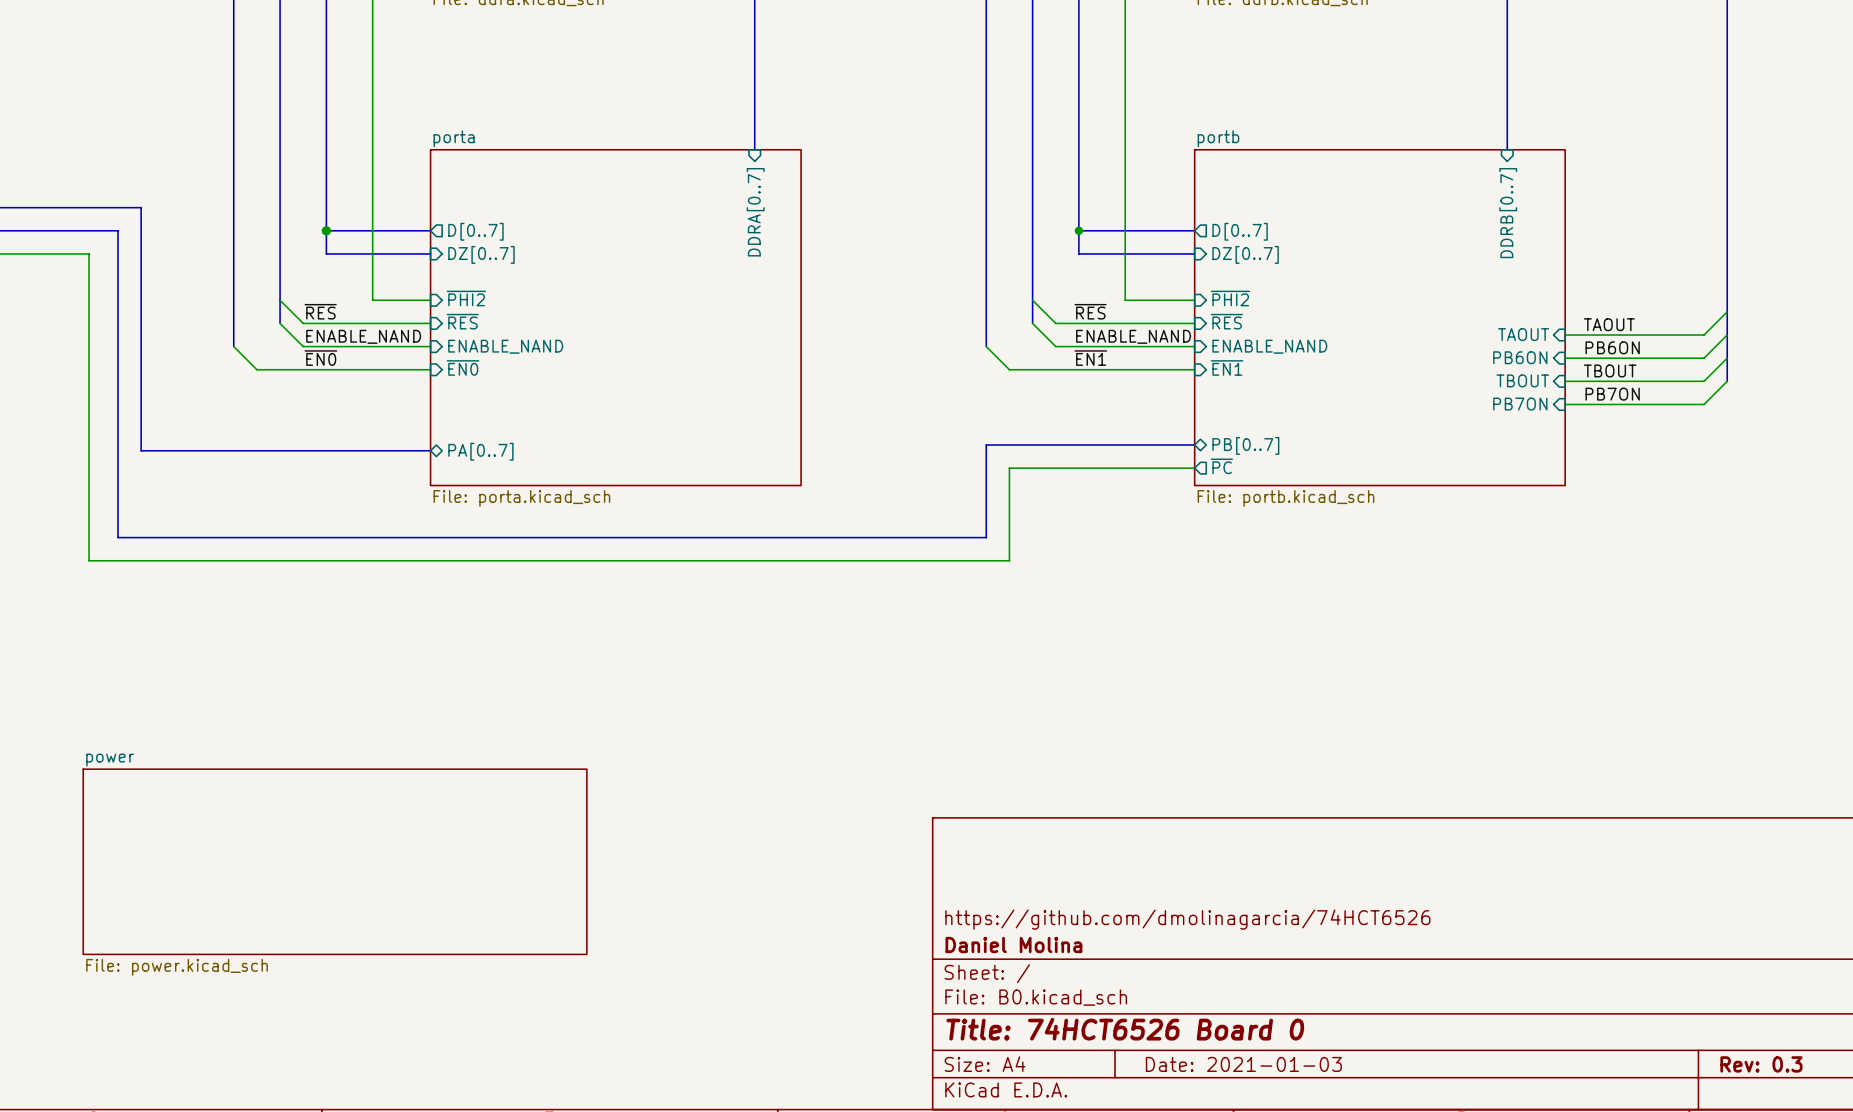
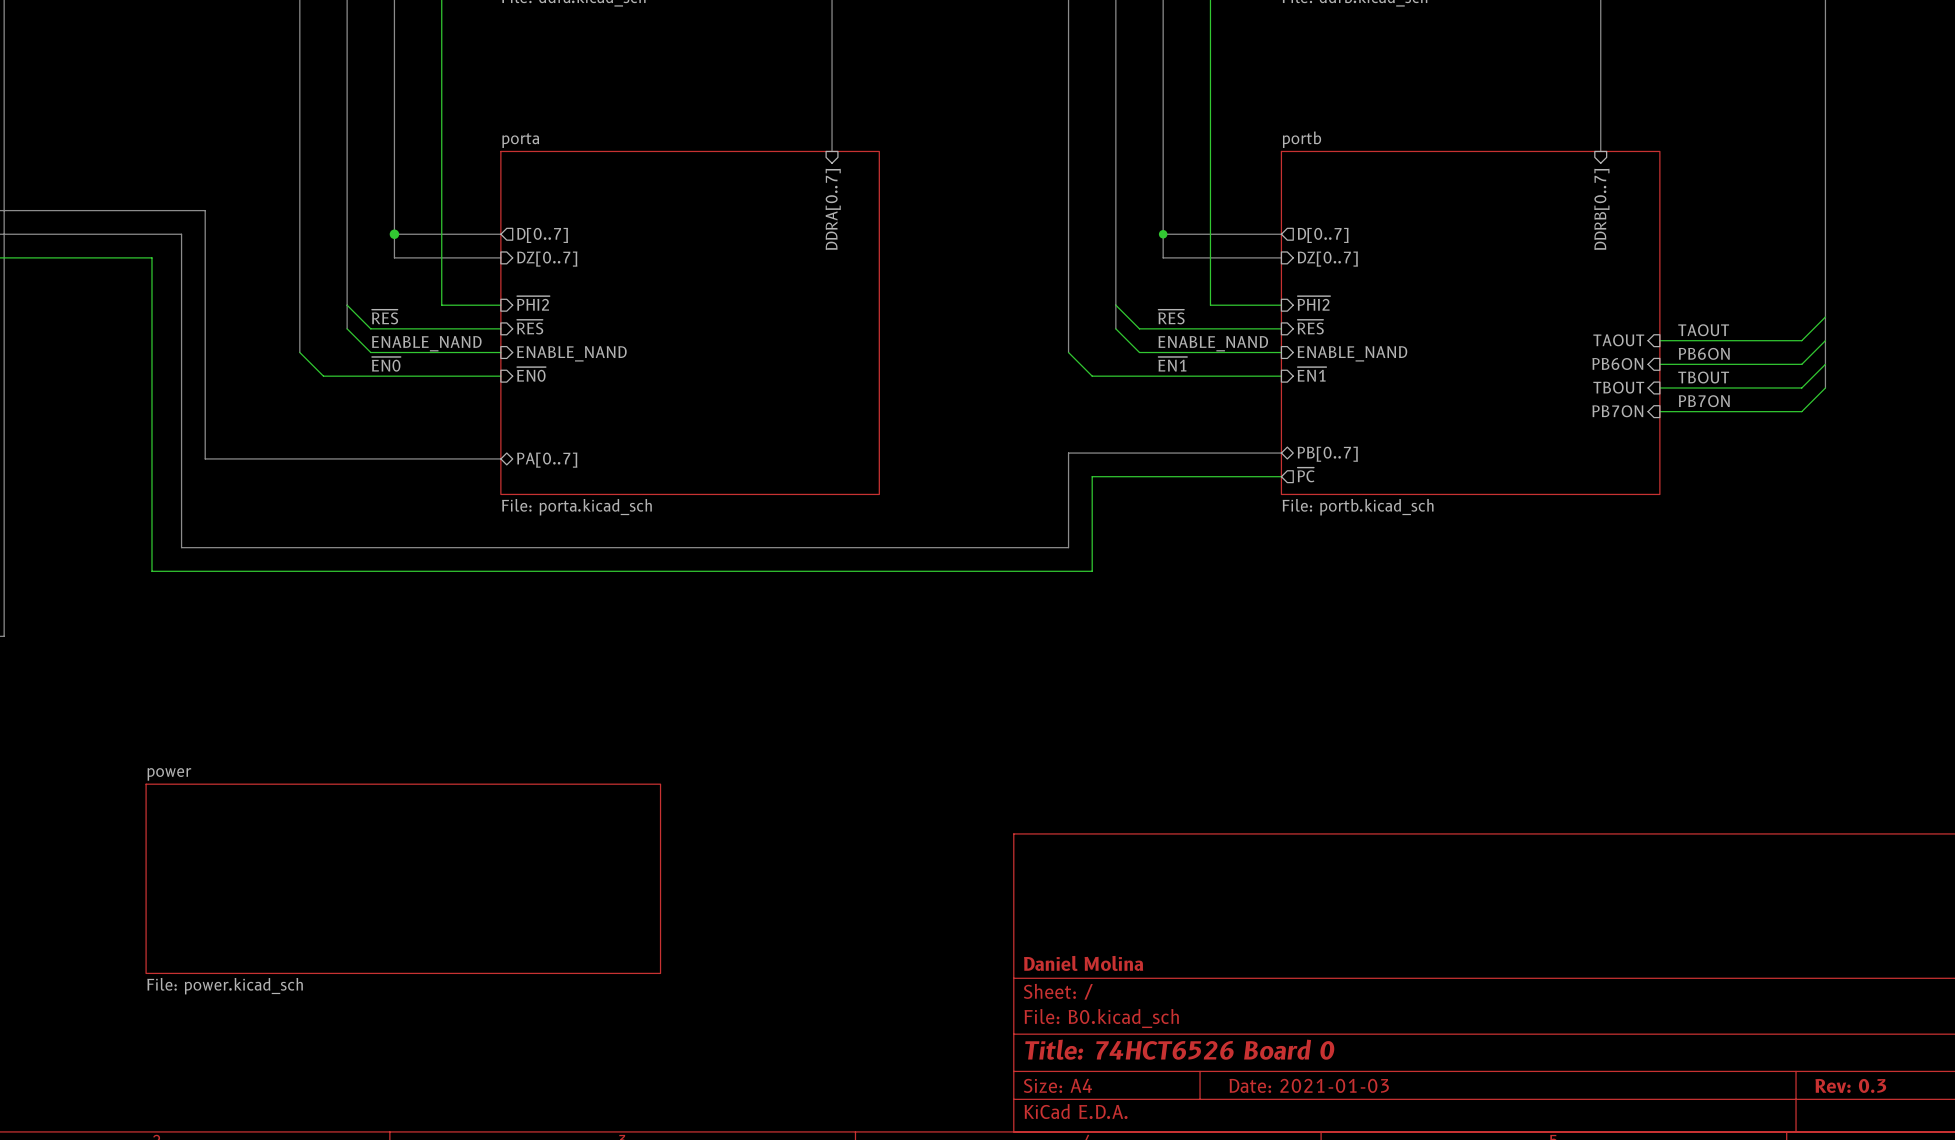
title block: https://github.com/dmolinagarcia/74HCT6526 (1187, 919) -> none

